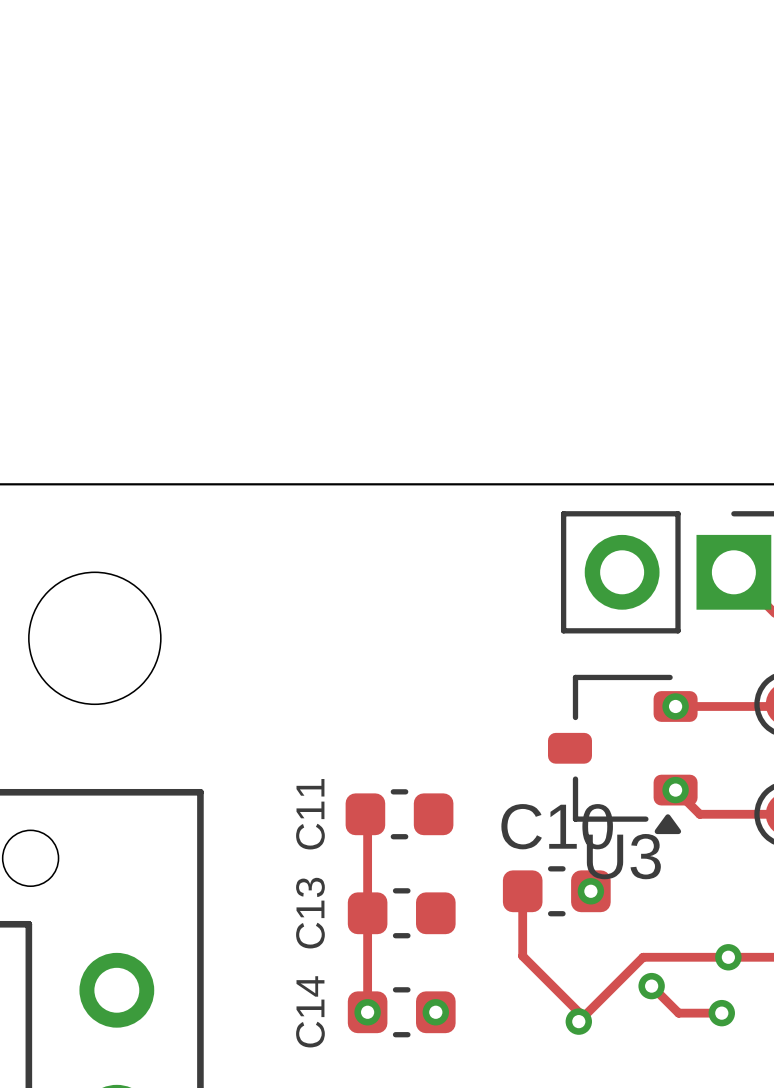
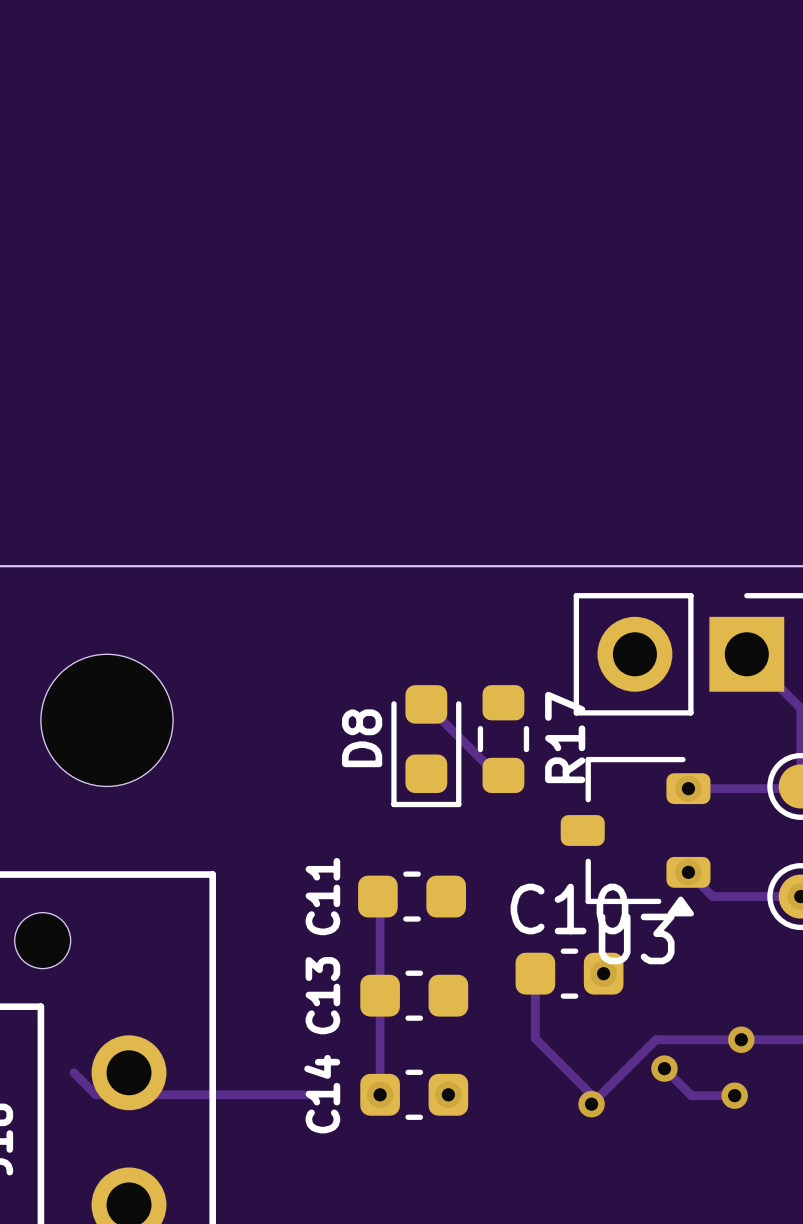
track: none -> (426, 704) (497, 775) (503, 775)
R17: none -> (503, 739)
D8: none -> (426, 746)
track: none -> (73, 1072) (95, 1094) (317, 1094)

